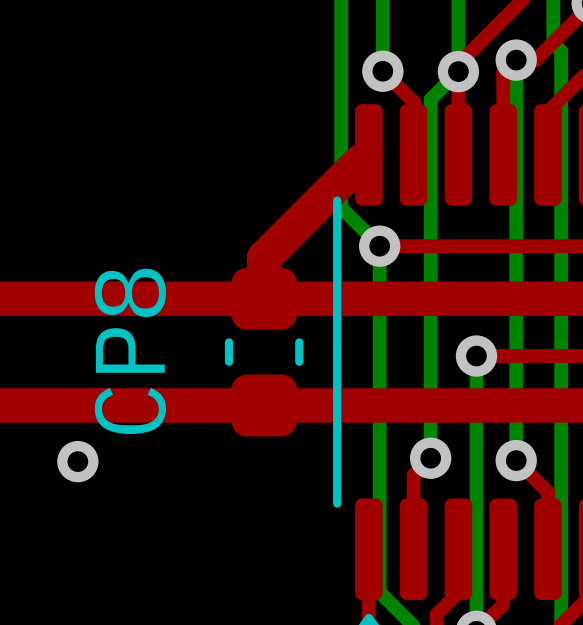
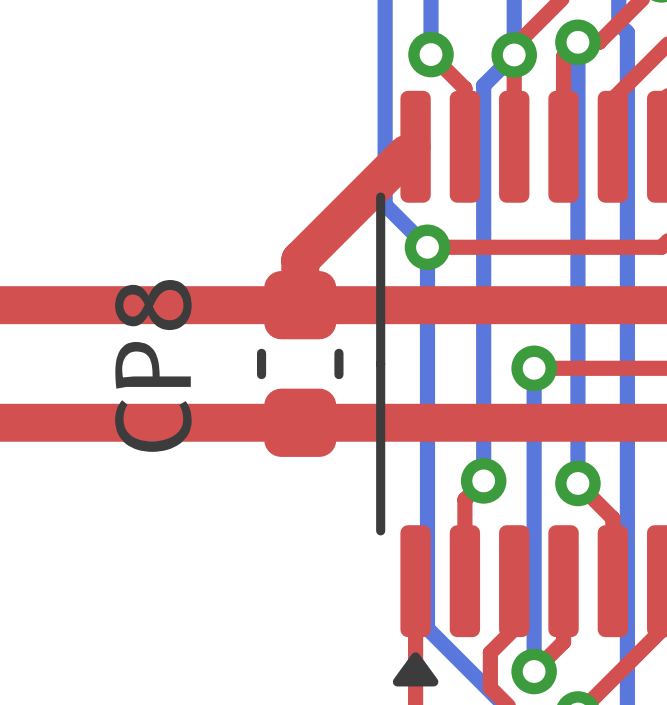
via: (77, 461) -> none

